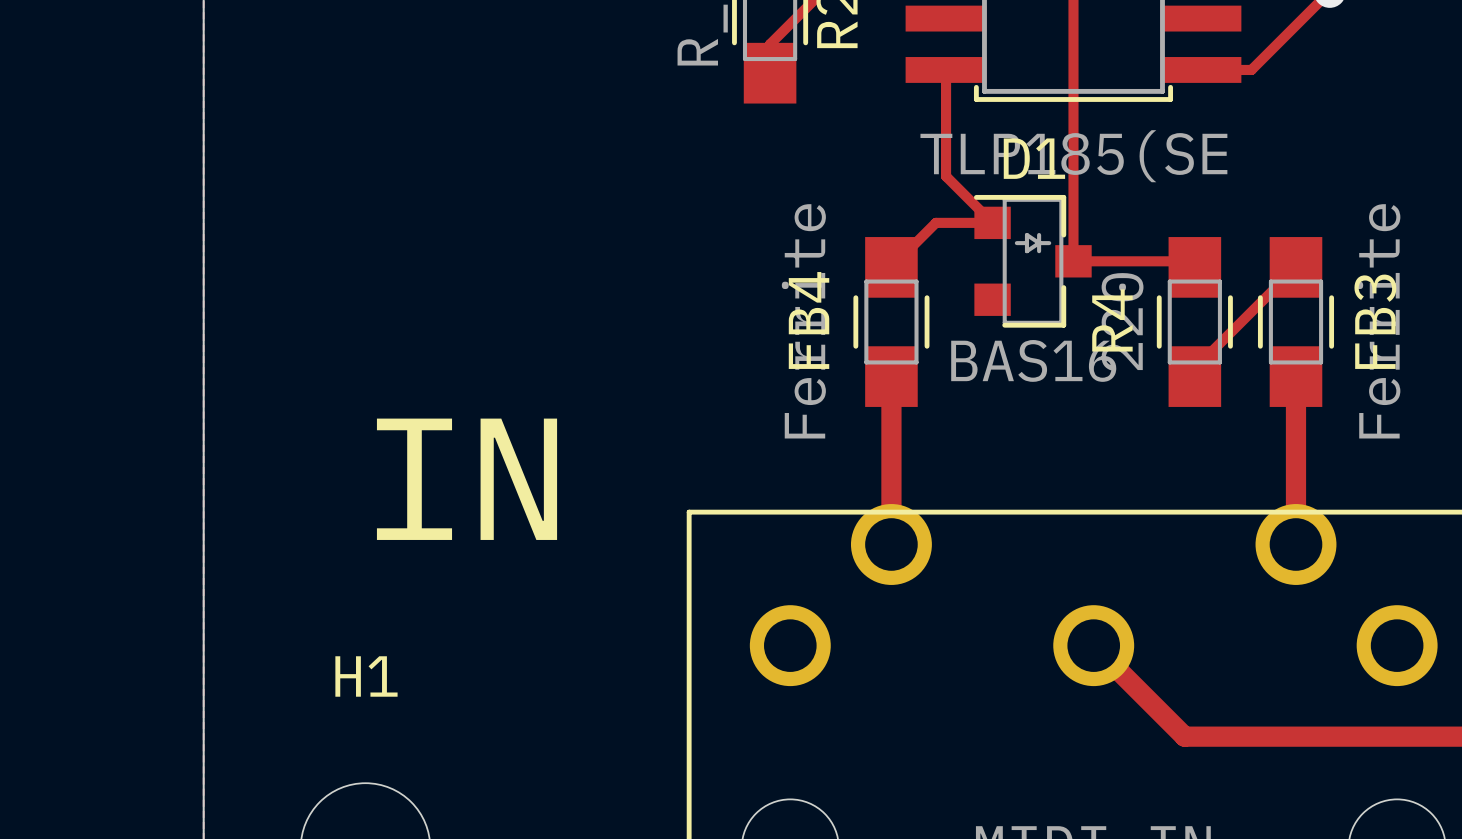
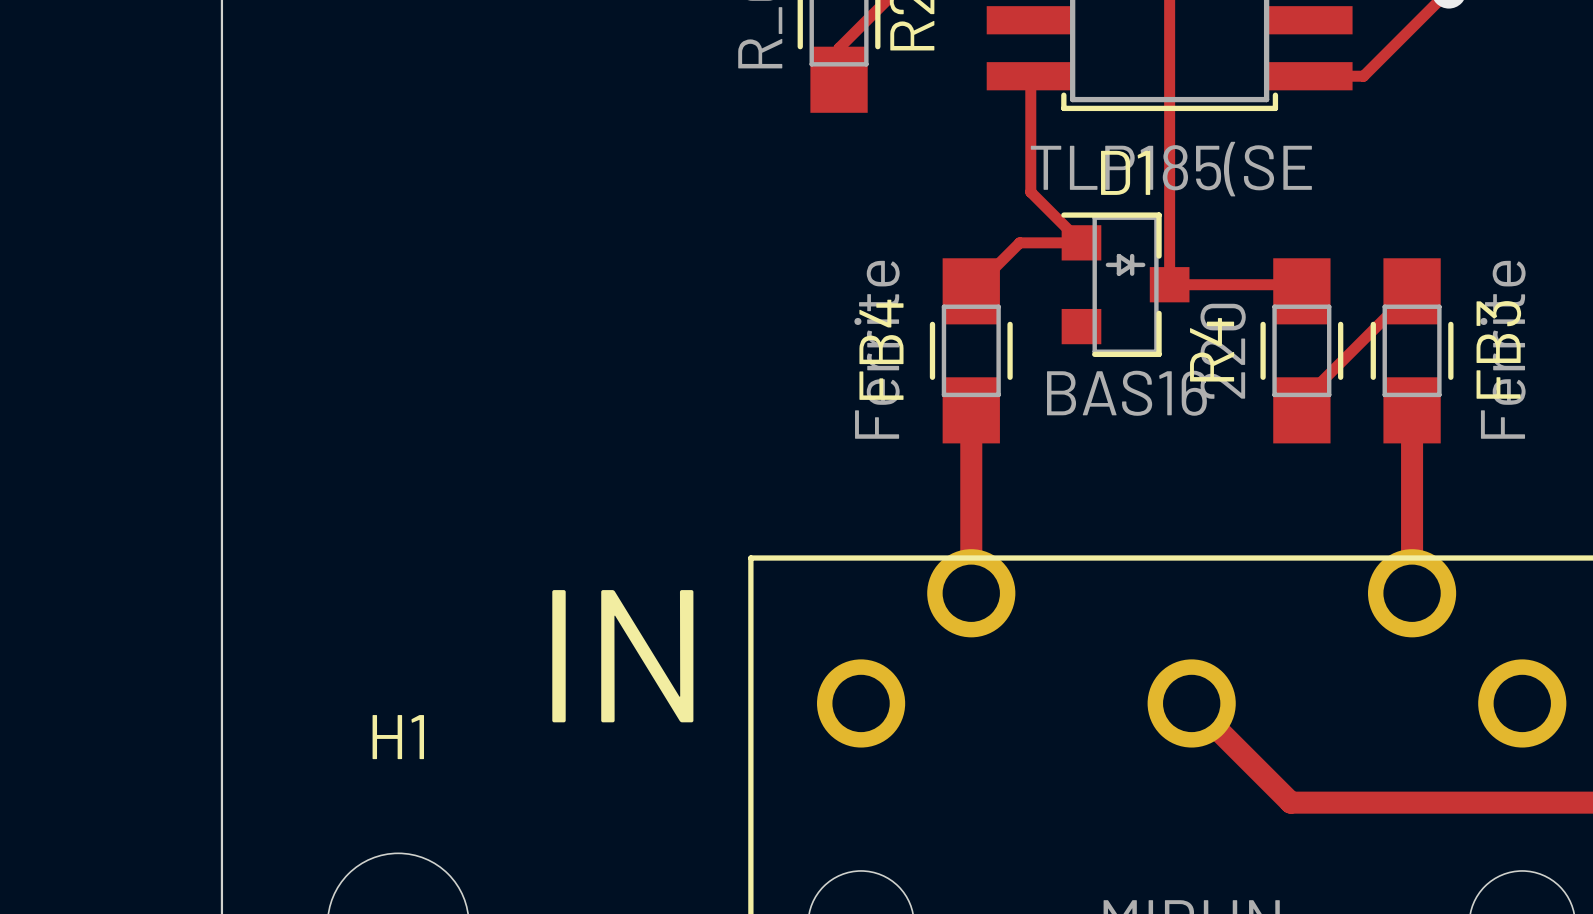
text position: IN (467, 479) -> IN (622, 656)

